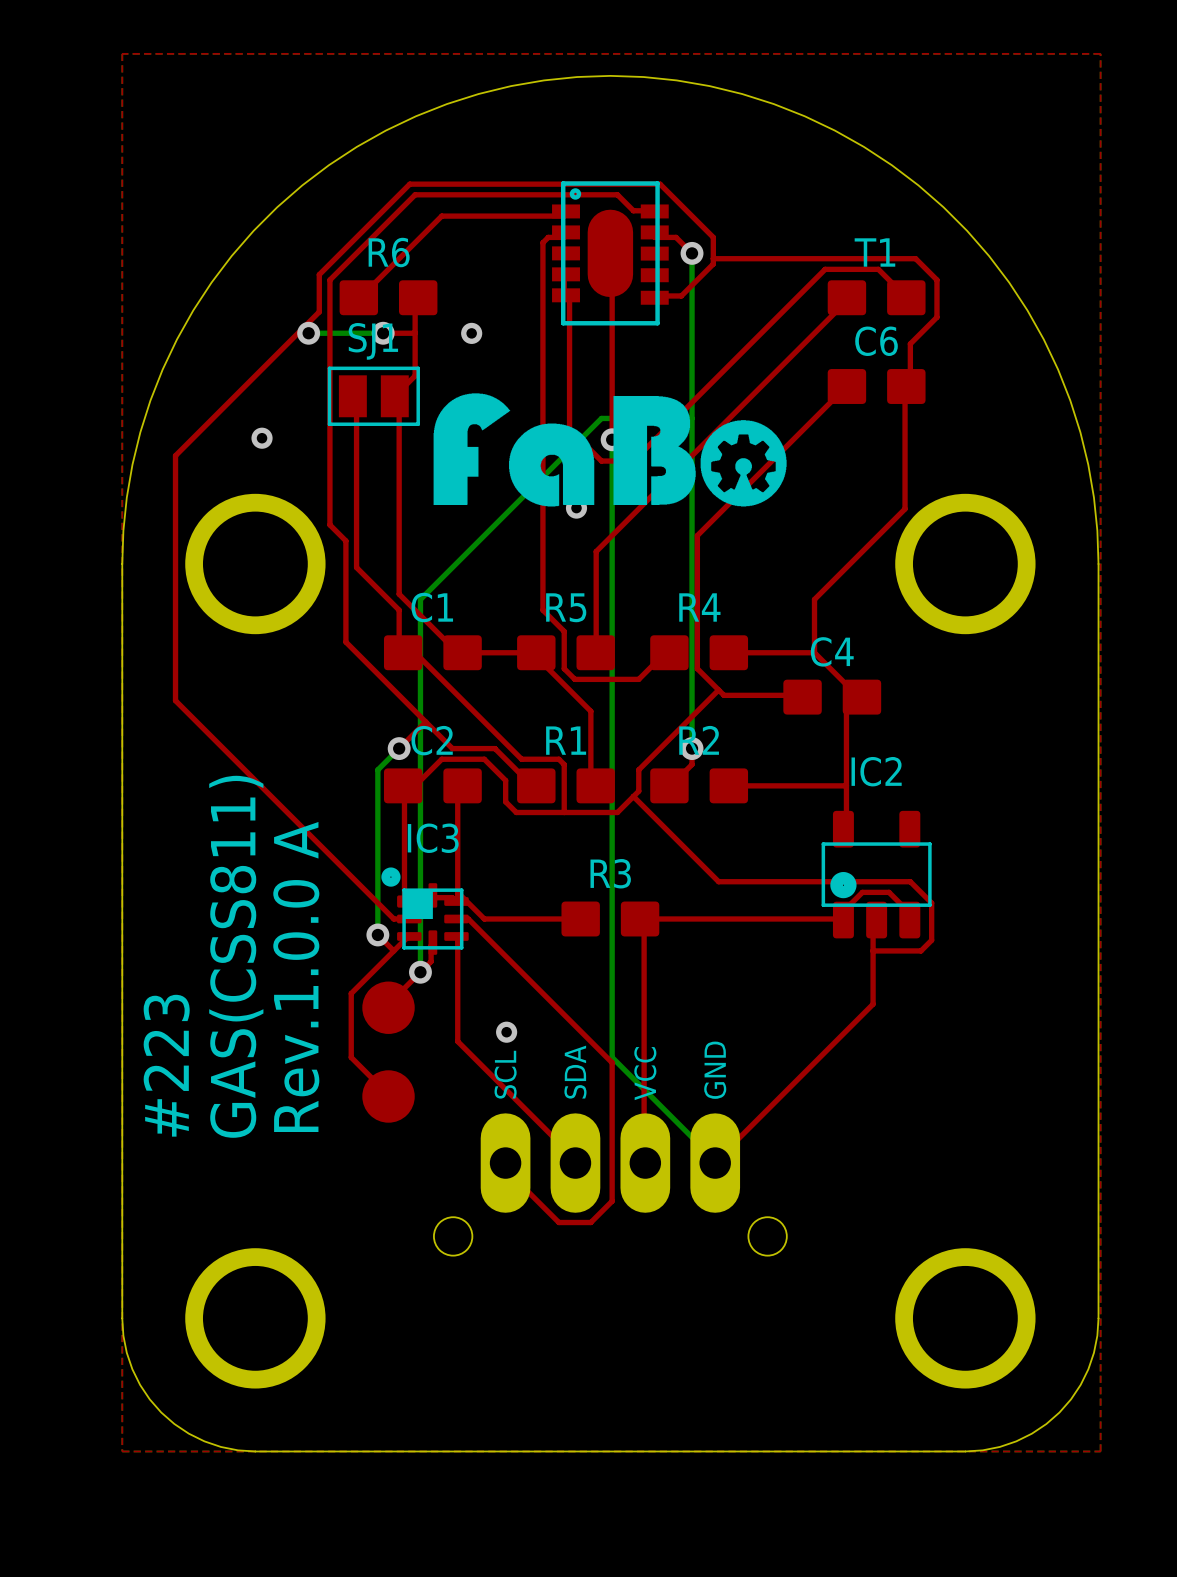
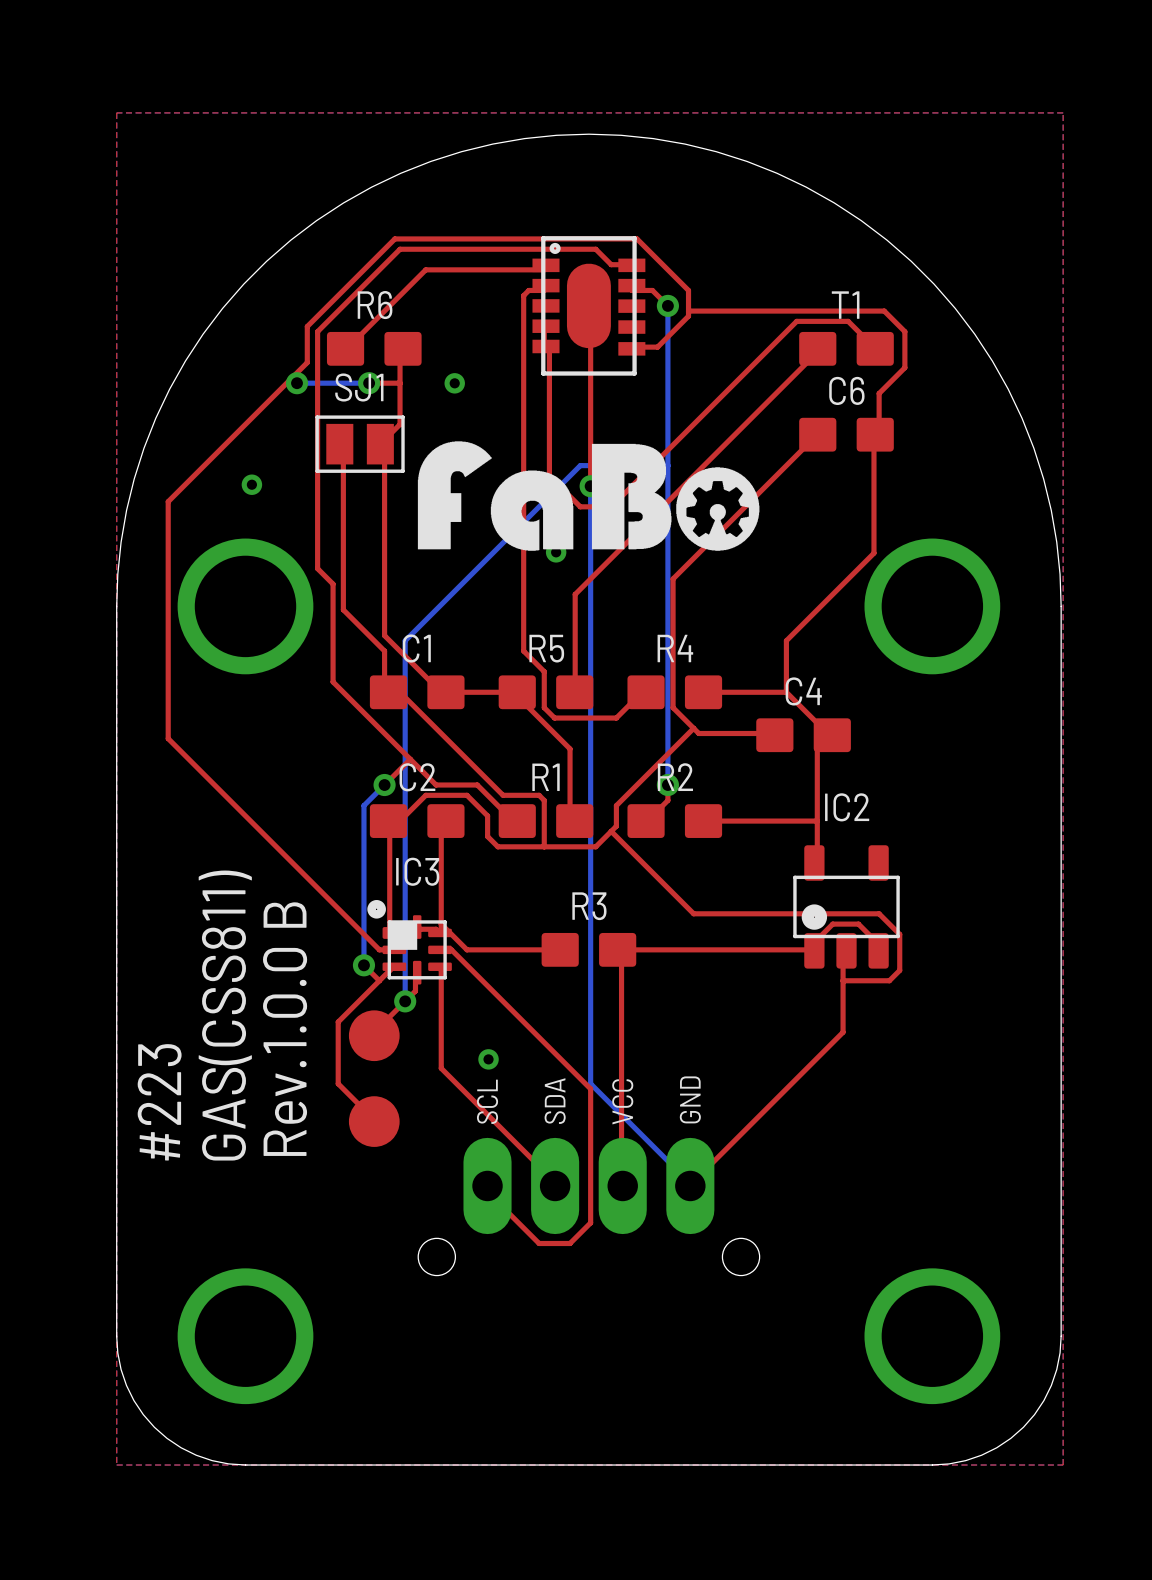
text: Rev.1.0.0 A (296, 976) -> Rev.1.0.0 B (285, 1029)

